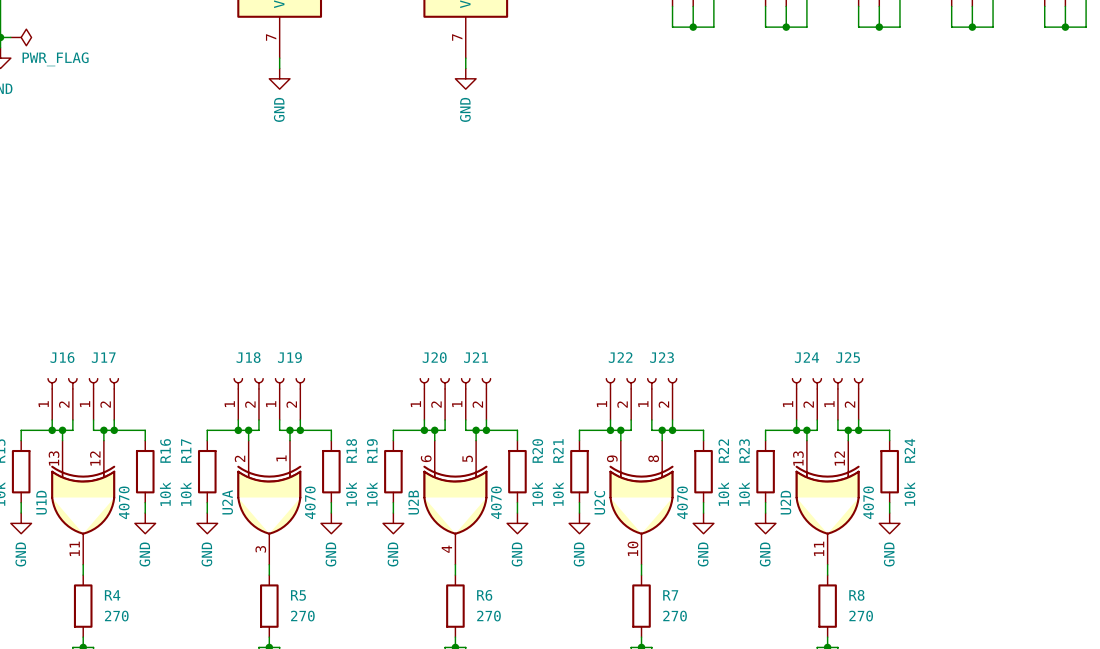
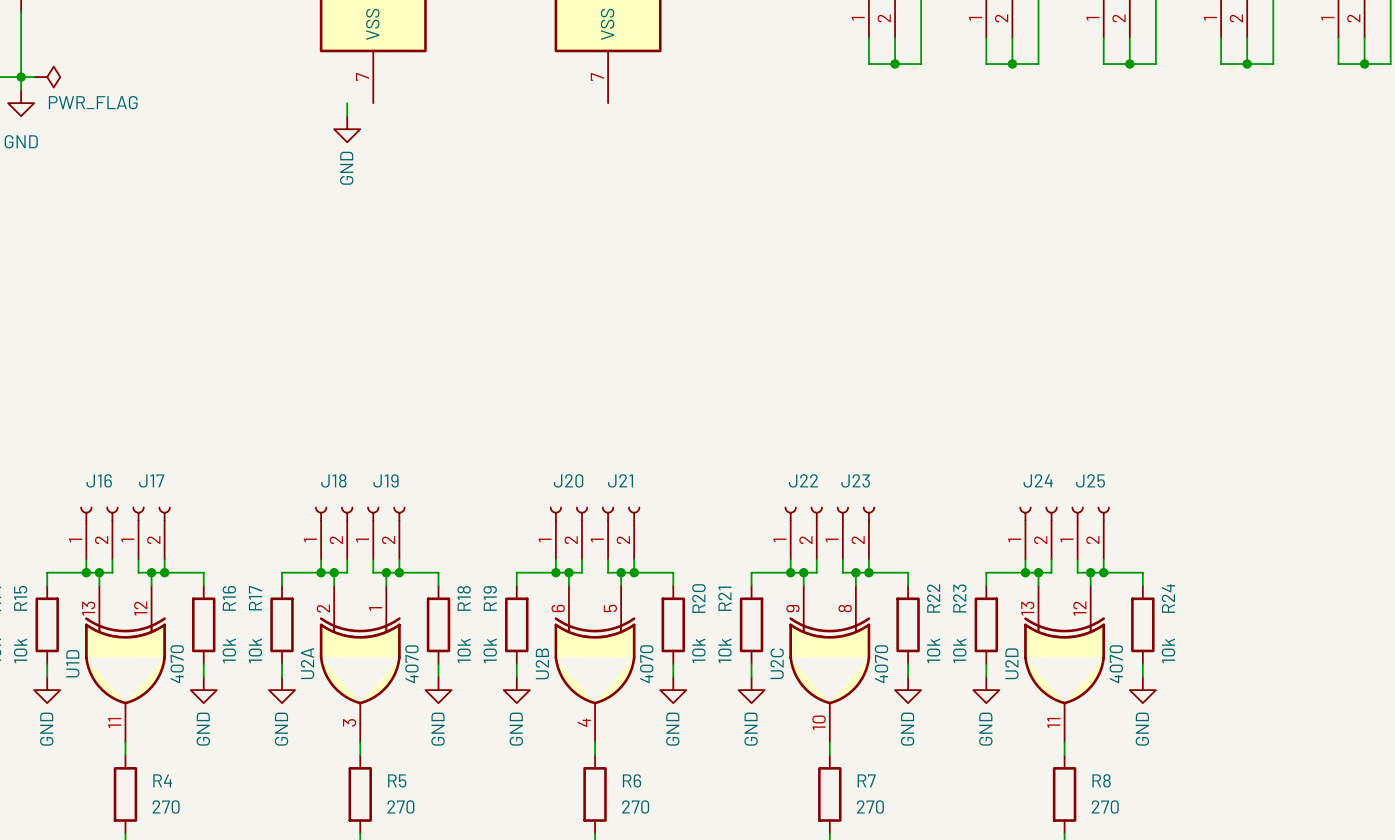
wire: (279, 58) (279, 68) -> (347, 103) (347, 116)
wire: (465, 58) (465, 68) -> none
power symbol position: GND (279, 78) -> GND (347, 129)
power symbol: GND (465, 78) -> none

